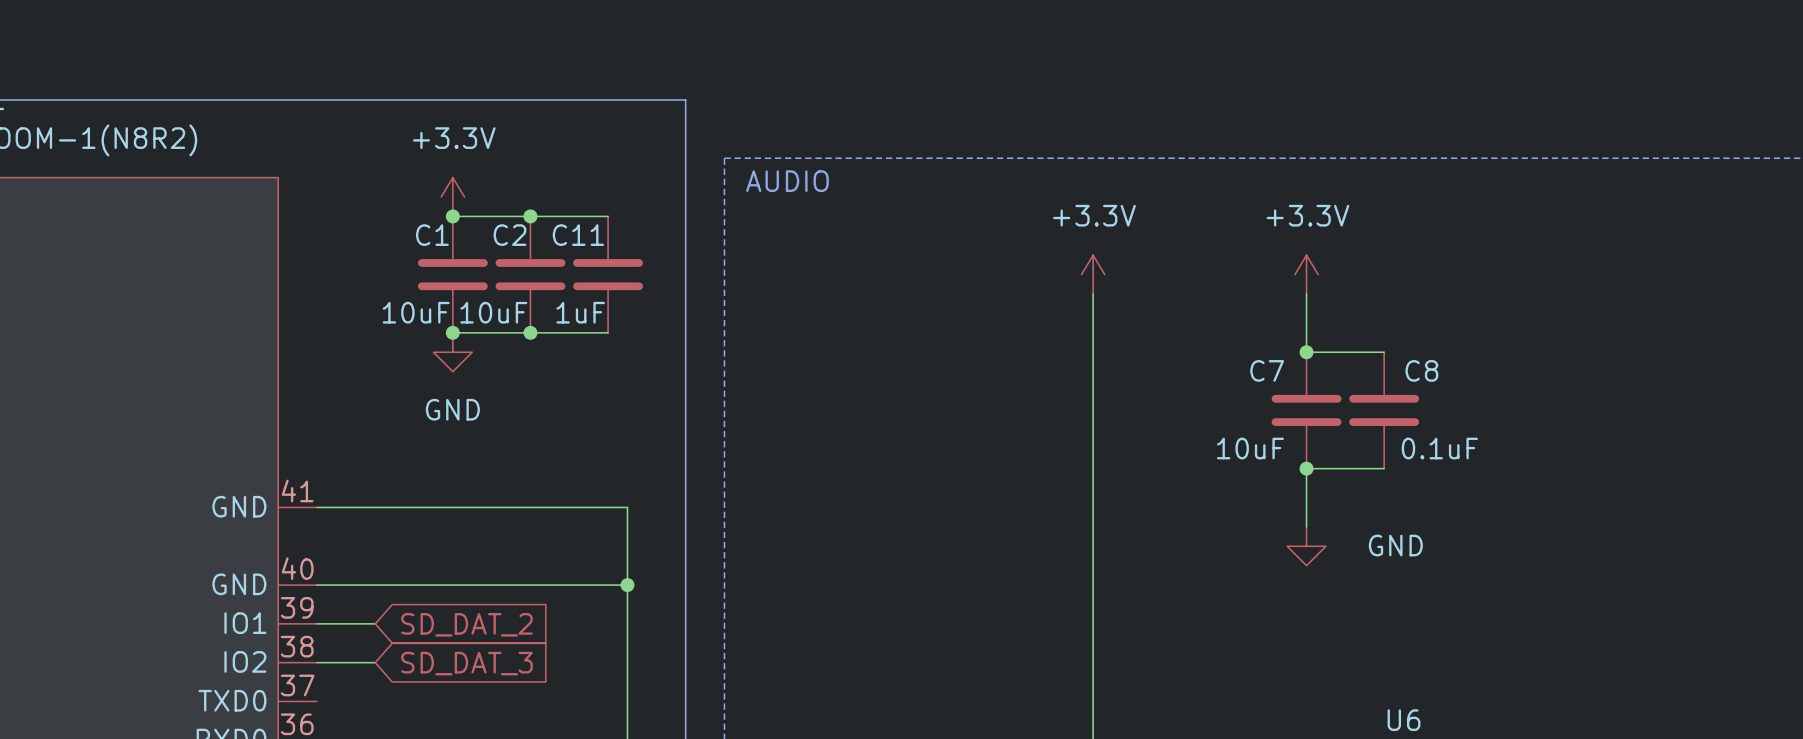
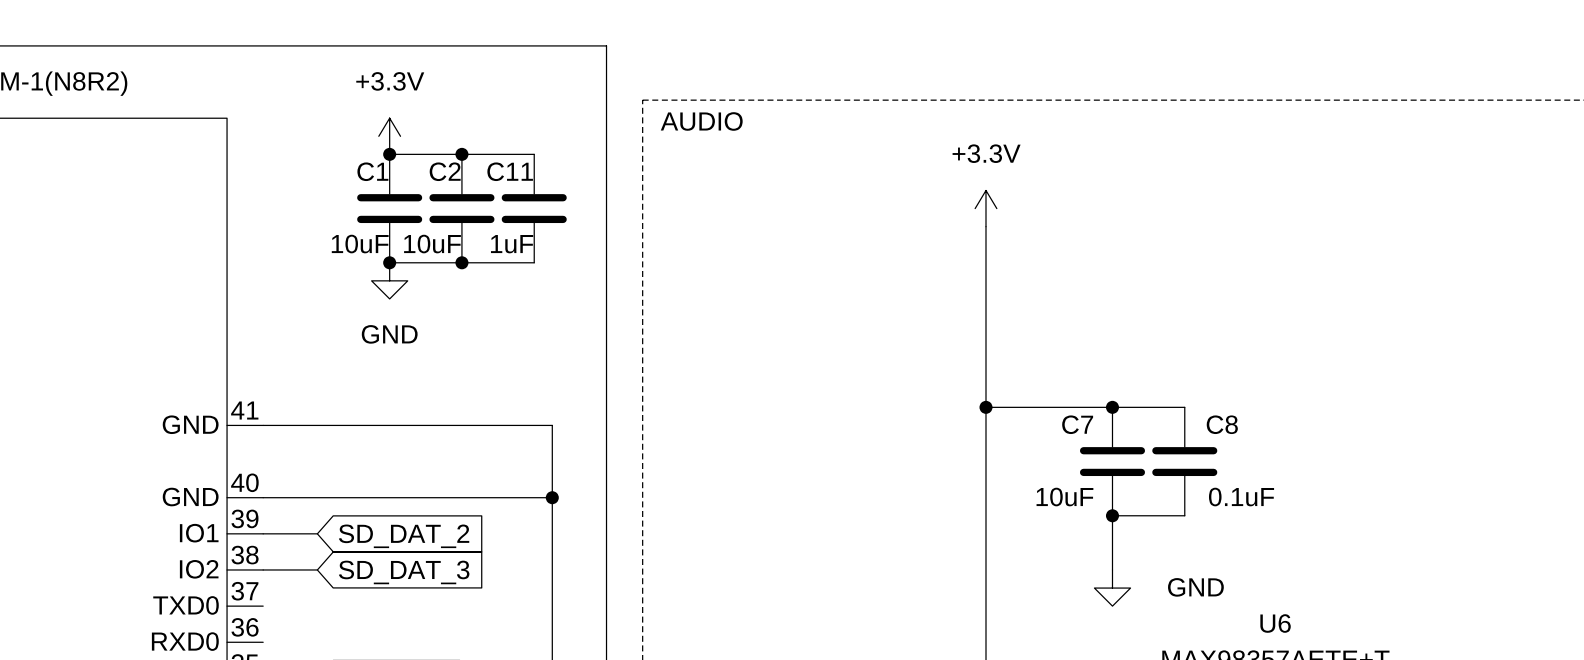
power symbol: +3.3V (1306, 274) -> none
wire: (1306, 294) (1306, 352) (1384, 352) -> none
junction: (1306, 352) -> none
C7 position: (1306, 410) -> (1112, 461)
C8 position: (1384, 410) -> (1184, 461)
junction: (1306, 468) -> none
wire: (1384, 468) (1306, 468) (1306, 526) -> (1184, 515) (1112, 515) (1112, 569)
wire: none -> (985, 407) (1184, 407)
junction: none -> (985, 407)
junction: none -> (1112, 407)
power symbol position: GND (1306, 546) -> GND (1112, 588)
junction: none -> (1112, 515)

